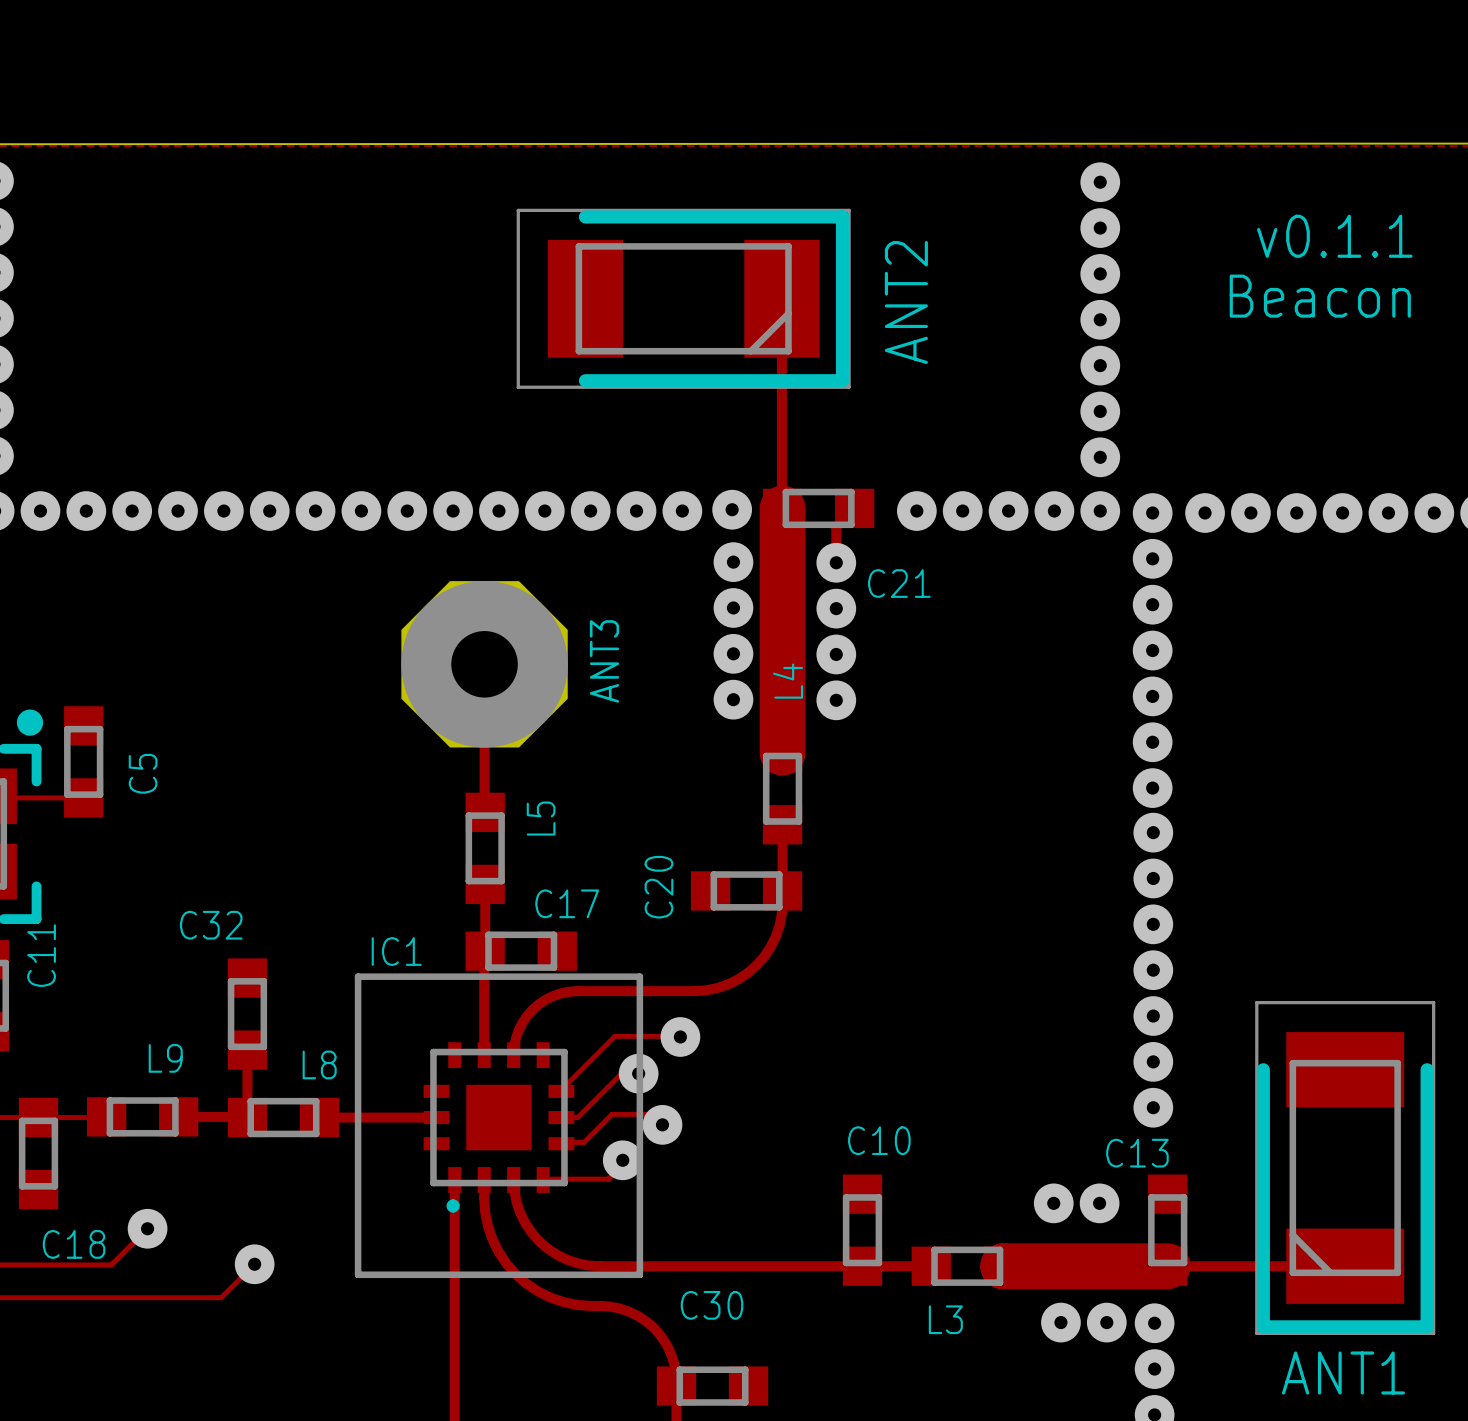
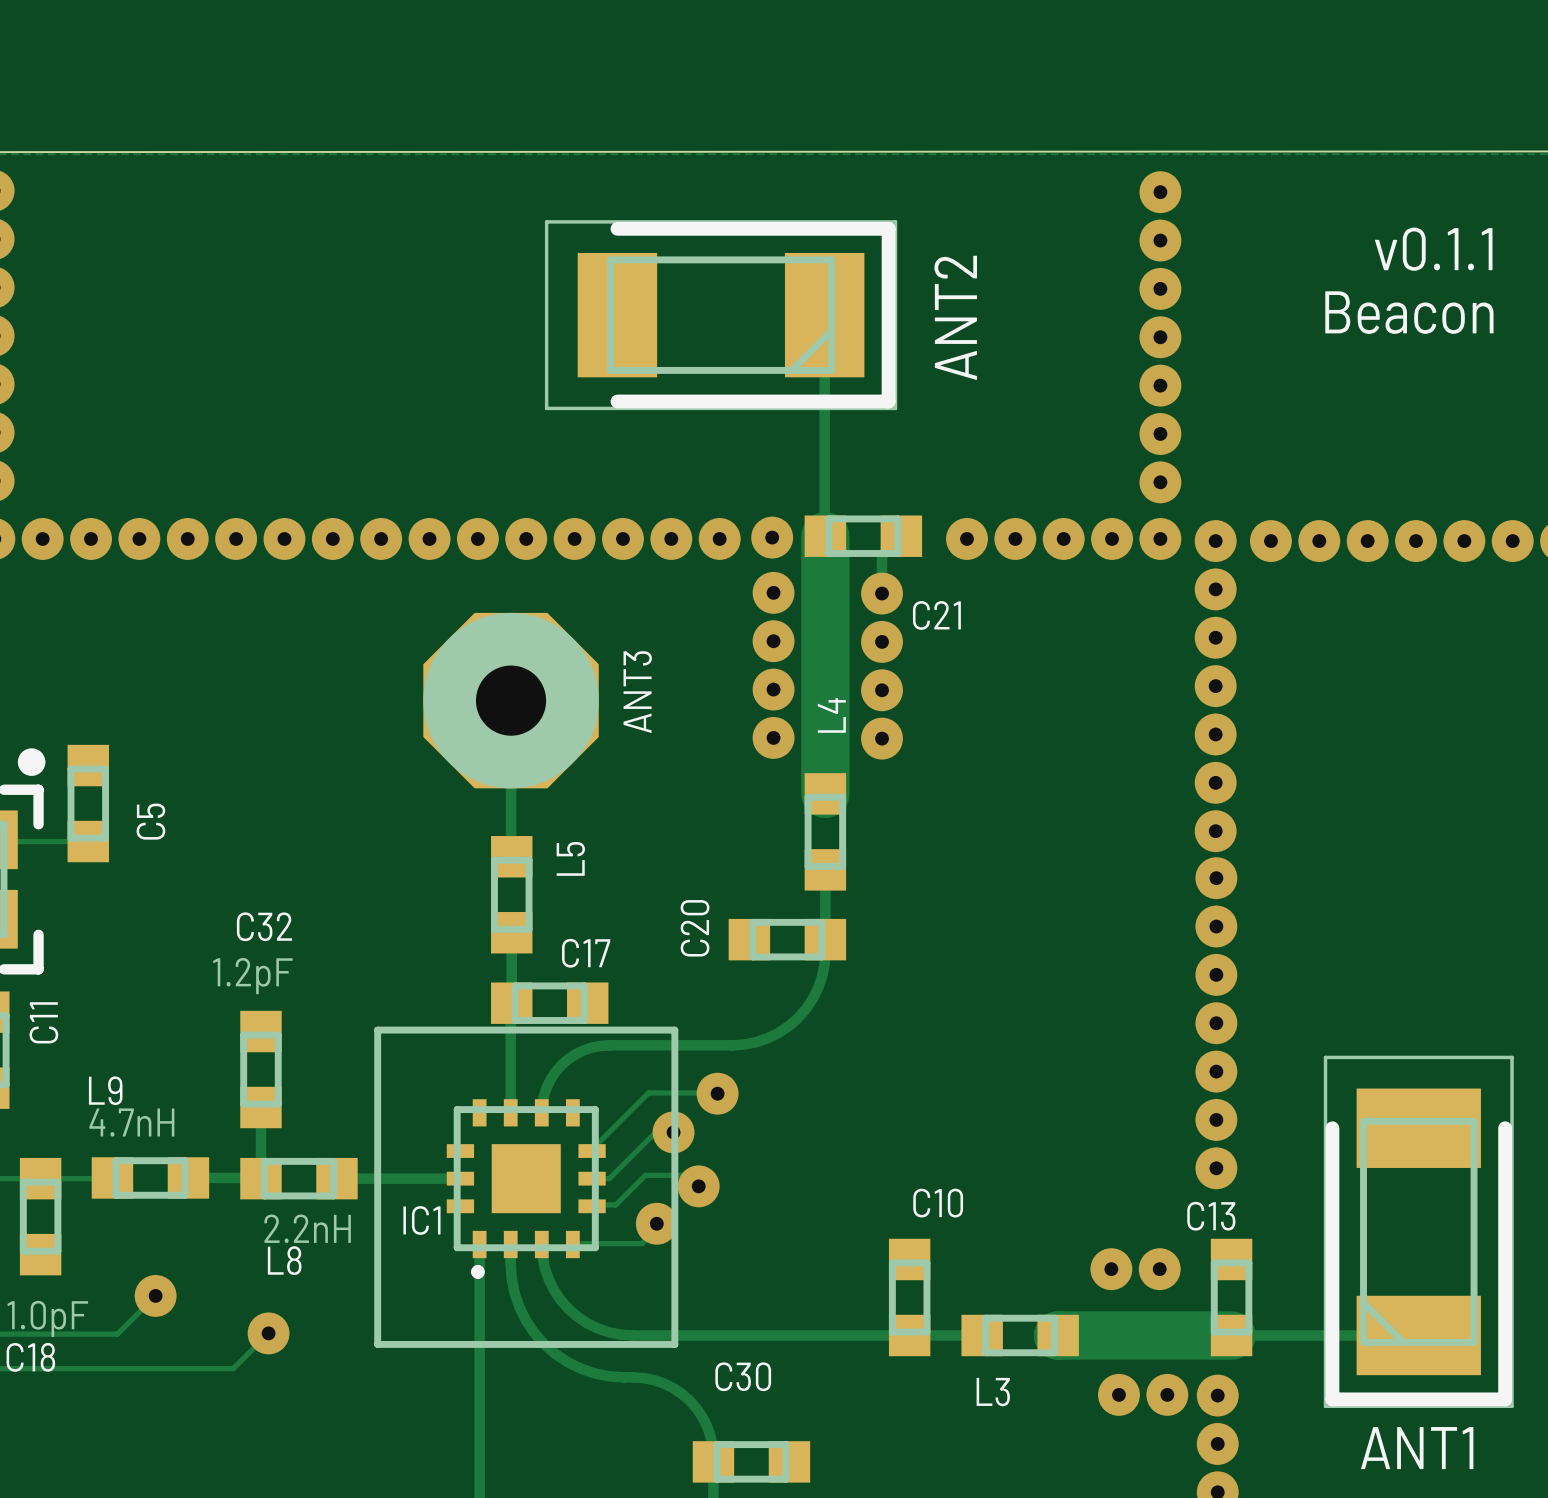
C32 name position: C32 (211, 925) -> C32 (264, 926)
C32 value: none -> 1.2pF (252, 976)
IC1 name position: IC1 (396, 951) -> IC1 (421, 1220)
L9 name position: L9 (165, 1058) -> L9 (105, 1090)
L9 value: none -> 4.7nH (131, 1122)
L8 name position: L8 (319, 1064) -> L8 (284, 1260)
L8 value: none -> 2.2nH (307, 1228)
C18 name position: C18 (74, 1244) -> C18 (30, 1357)
C18 value: none -> 1.0pF (47, 1318)

